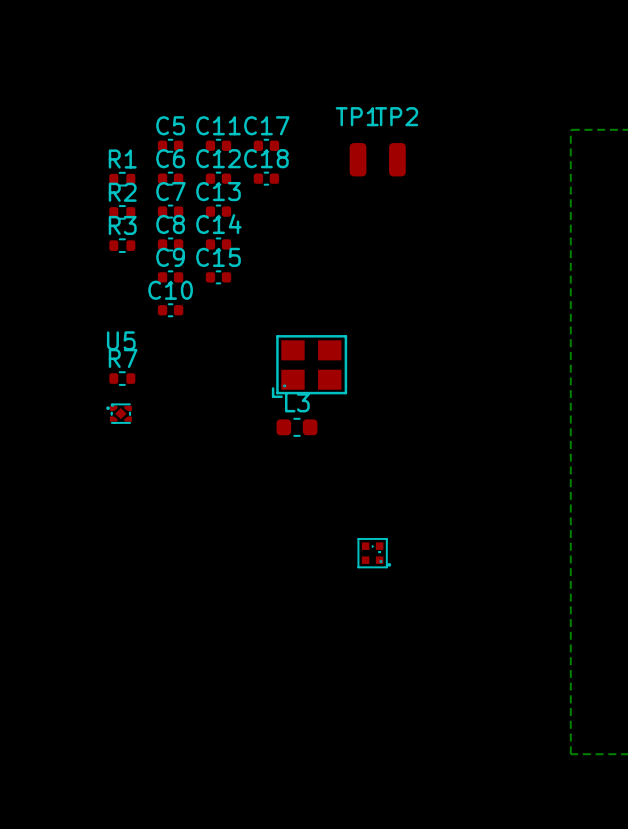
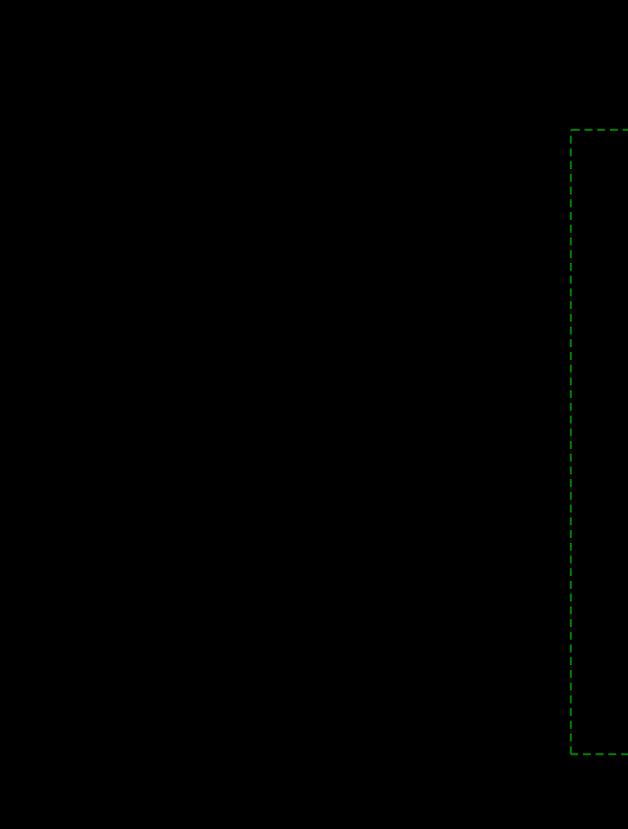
C5: (170, 145) -> none
C11: (218, 145) -> none
C17: (266, 145) -> none
TP1: (358, 159) -> none
TP2: (397, 159) -> none
C6: (170, 178) -> none
C12: (218, 178) -> none
C18: (266, 178) -> none
R1: (122, 179) -> none
C7: (170, 211) -> none
C13: (218, 211) -> none
R2: (122, 212) -> none
C8: (170, 244) -> none
C14: (218, 244) -> none
R3: (122, 245) -> none
C9: (170, 277) -> none
C15: (218, 277) -> none
C10: (170, 310) -> none
part: (309, 366) -> none
R7: (122, 378) -> none
U5: (119, 413) -> none
L3: (296, 427) -> none
part: (374, 553) -> none

